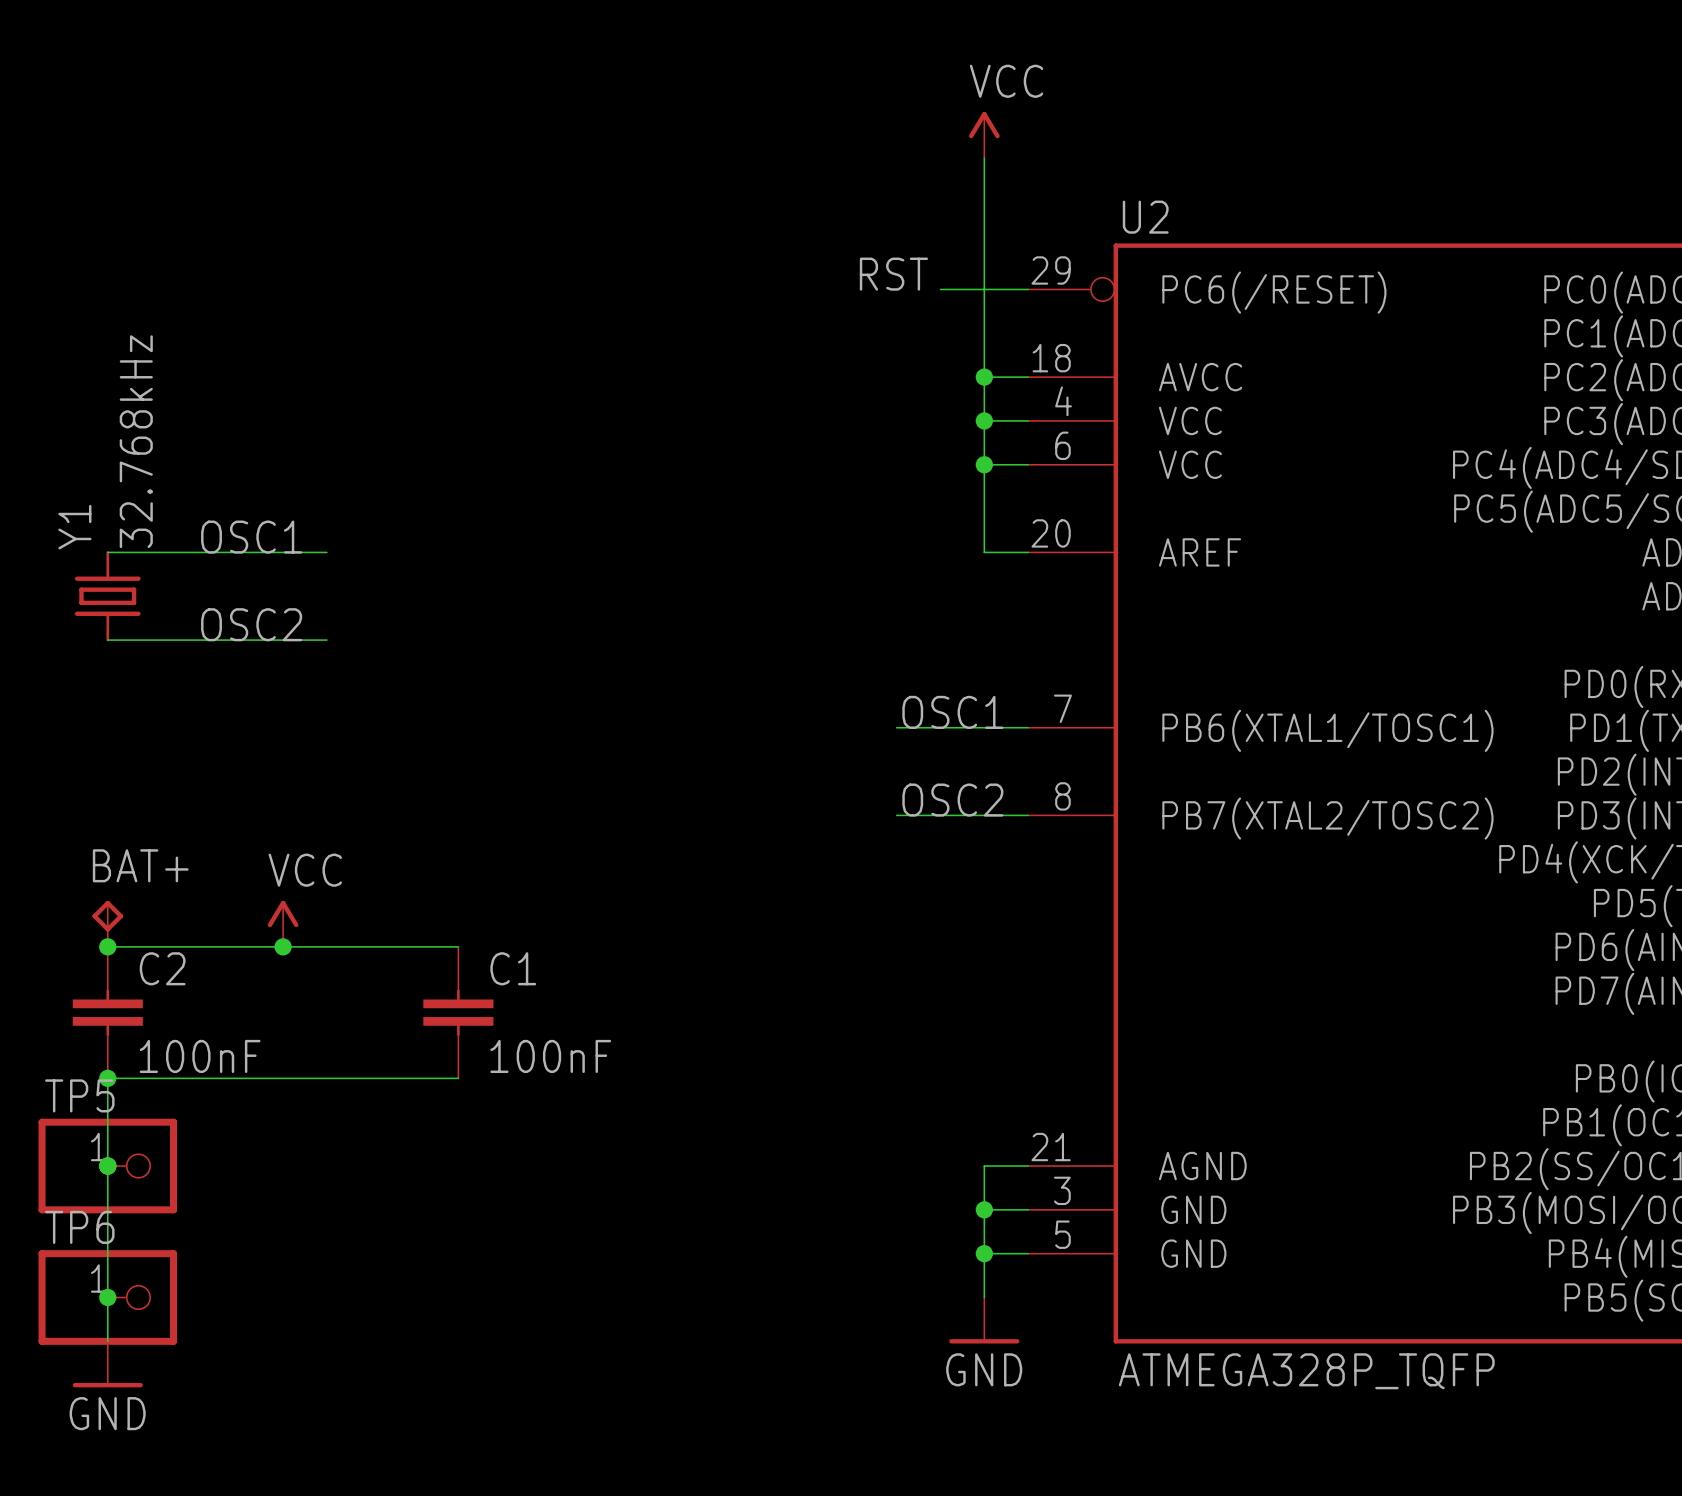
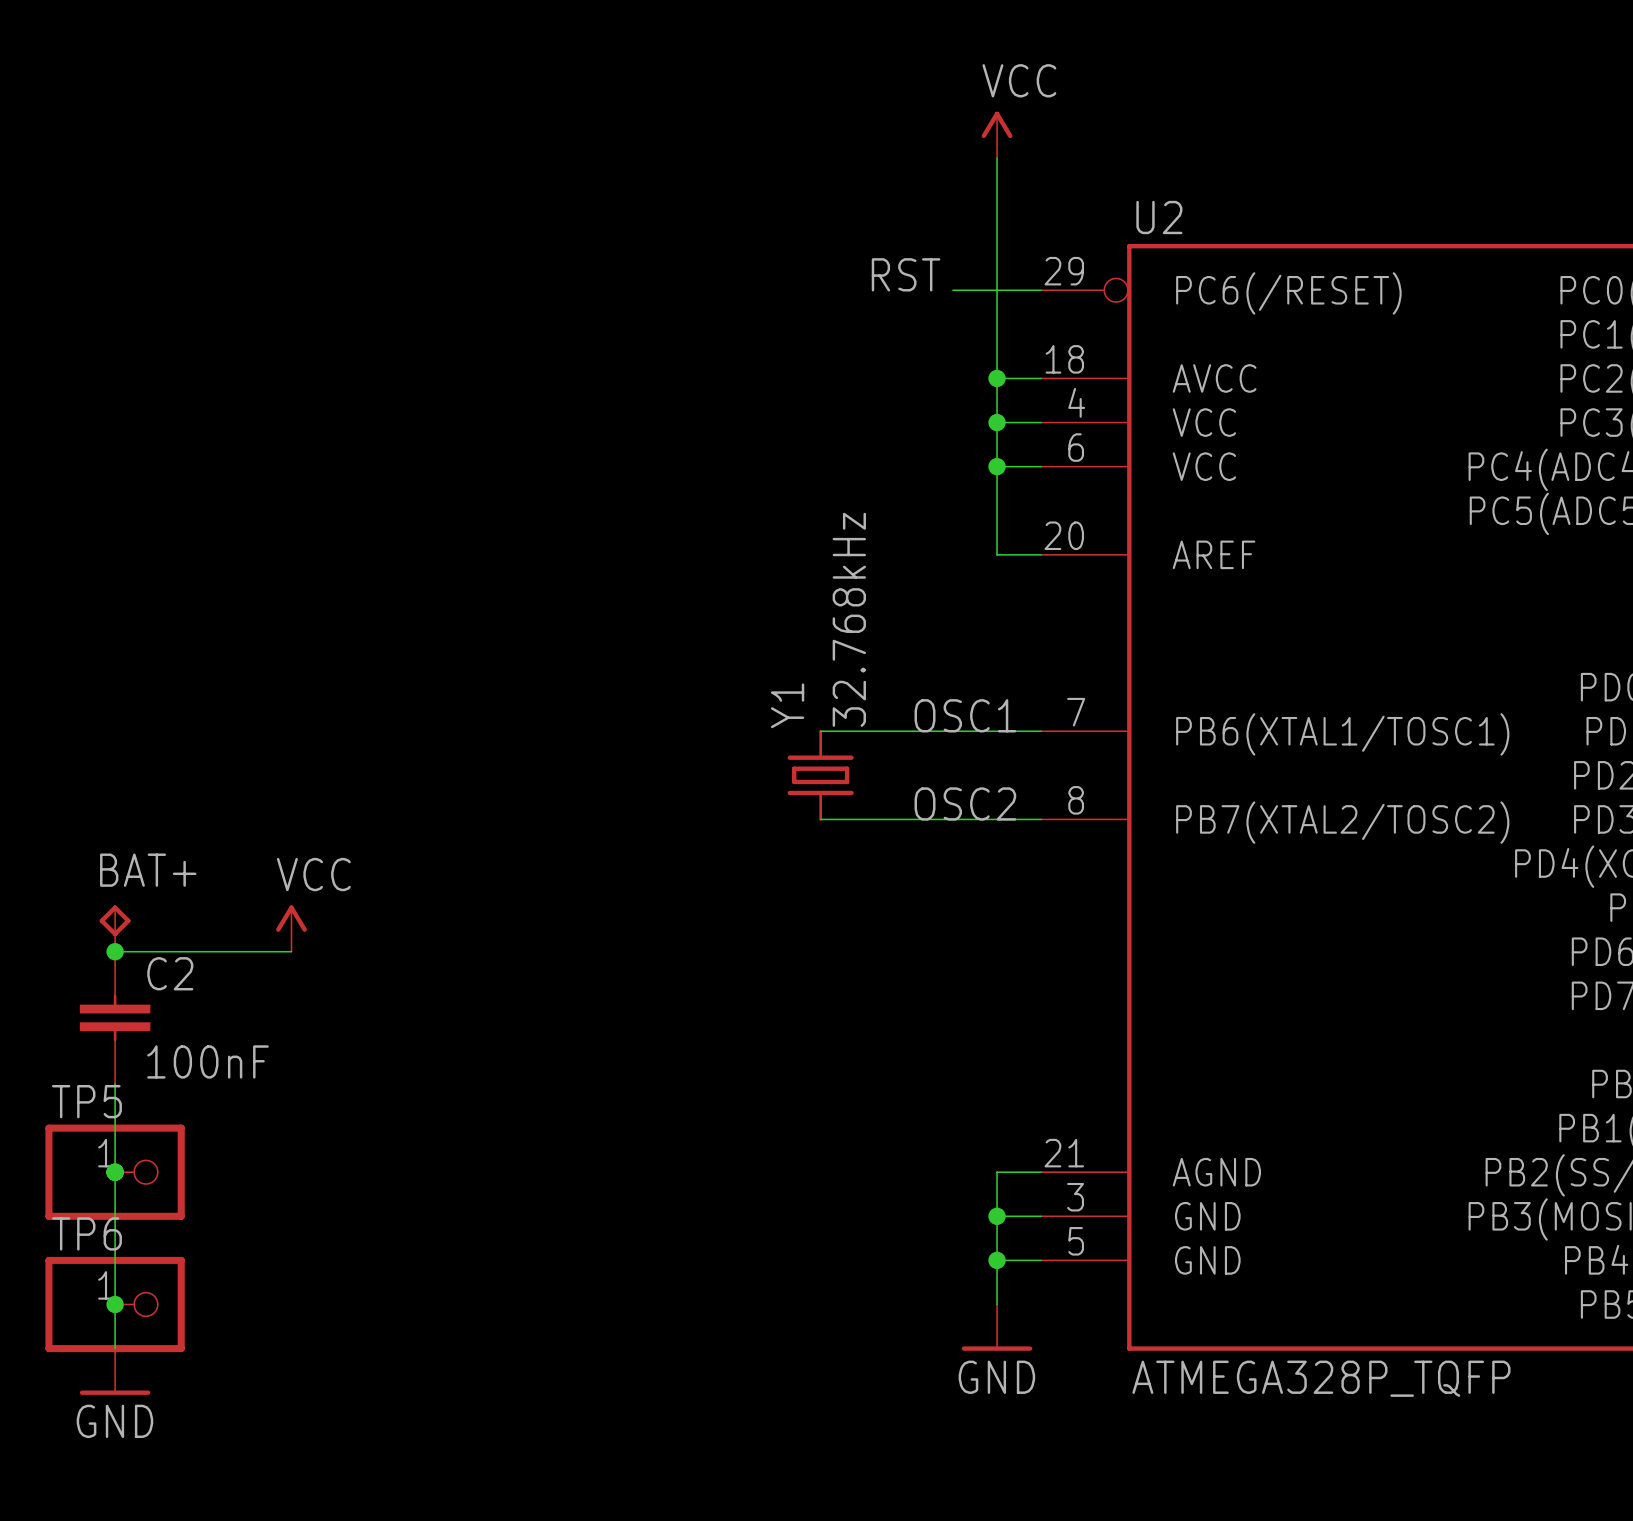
label: OSC1 (251, 537) -> none
wire: (107, 552) (326, 552) -> none
Y1 position: (107, 596) -> (820, 775)
label: OSC2 (251, 624) -> none
wire: (107, 640) (326, 640) -> none
wire: none -> (820, 731) (908, 731)
wire: none -> (820, 819) (908, 819)
wire: (283, 946) (458, 946) -> none
junction: (283, 946) -> none
C1: 100nF (458, 1012) -> none
wire: (107, 1078) (458, 1078) -> none
junction: (107, 1078) -> none

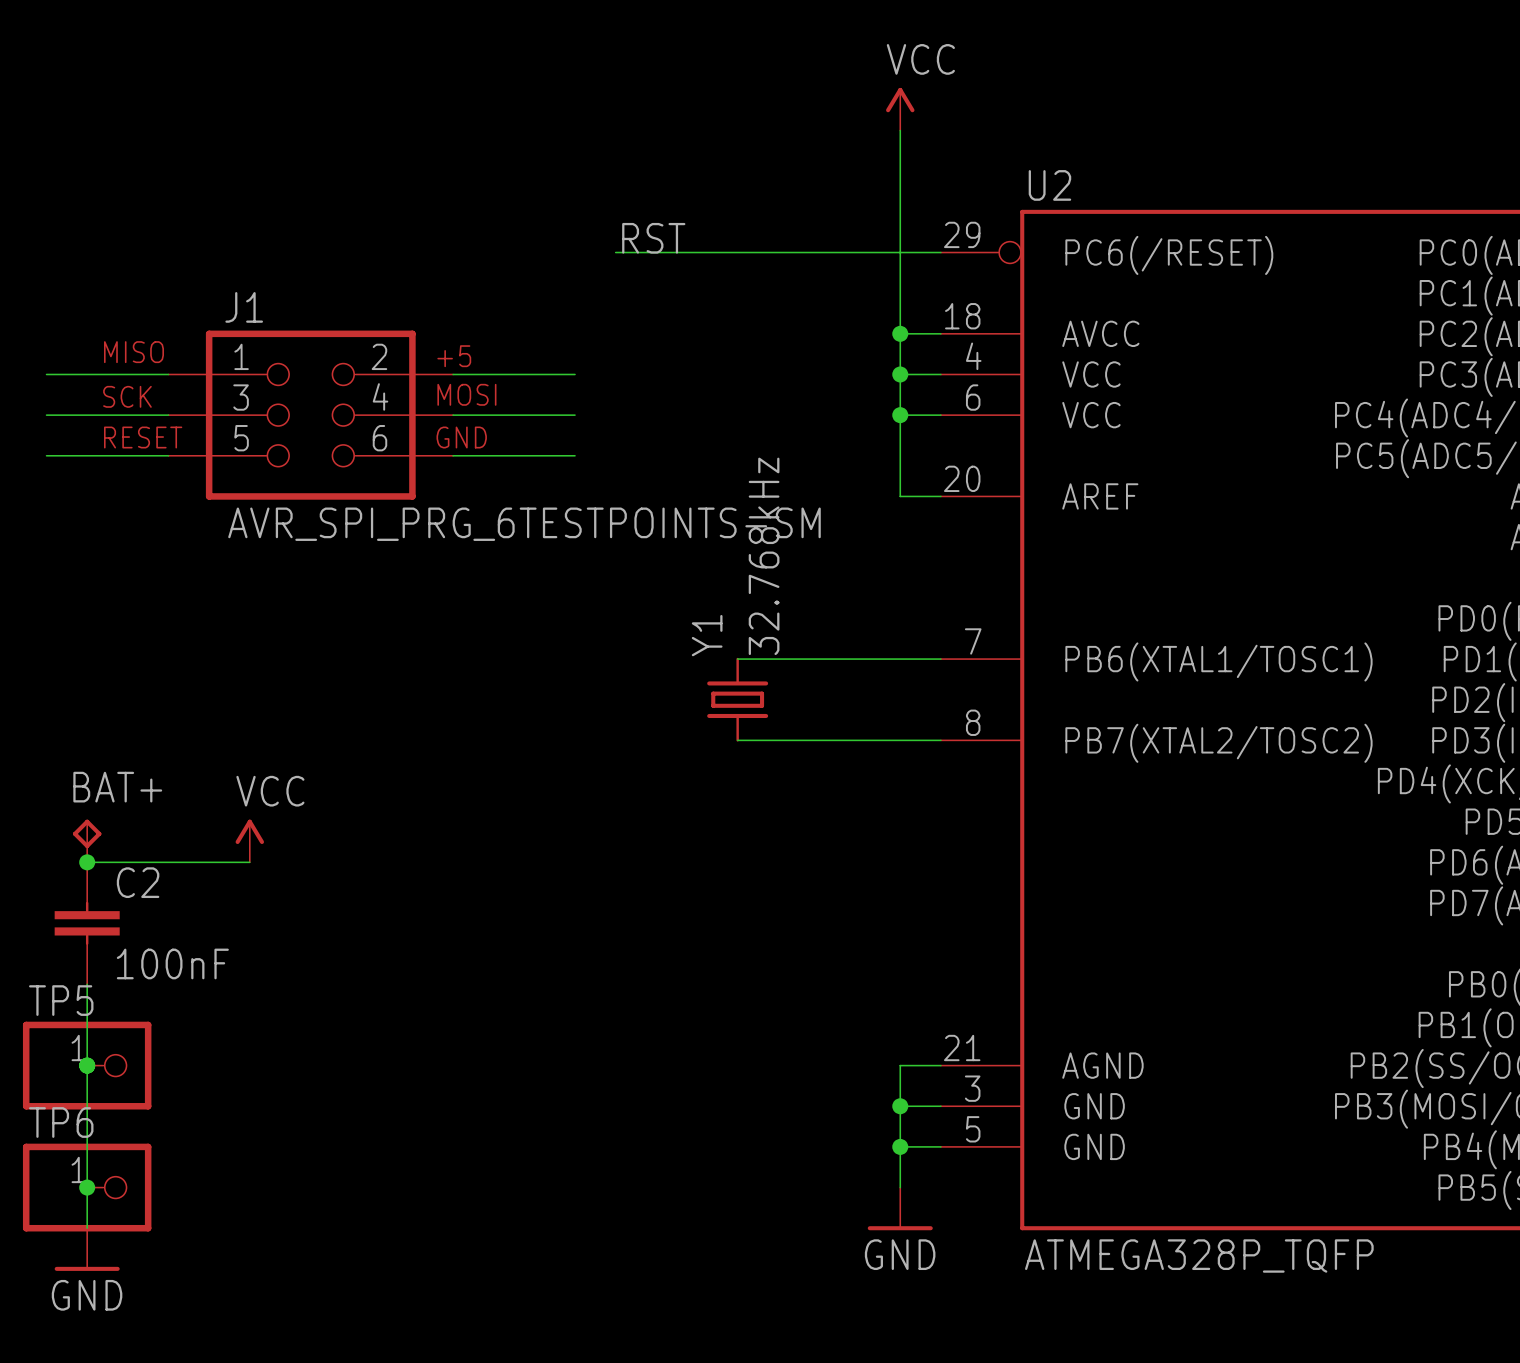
label position: RST (906, 274) -> RST (653, 238)
wire: none -> (615, 252) (859, 252)
wire: none -> (46, 374) (168, 374)
wire: none -> (453, 374) (575, 374)
wire: none -> (46, 415) (168, 415)
J1: none -> AVR_SPI_PRG_6TESTPOINTS-SM (310, 415)
wire: none -> (453, 415) (575, 415)
wire: none -> (46, 455) (168, 455)
wire: none -> (453, 455) (575, 455)
label: OSC1 (965, 715) -> none
label: OSC2 (965, 804) -> none

